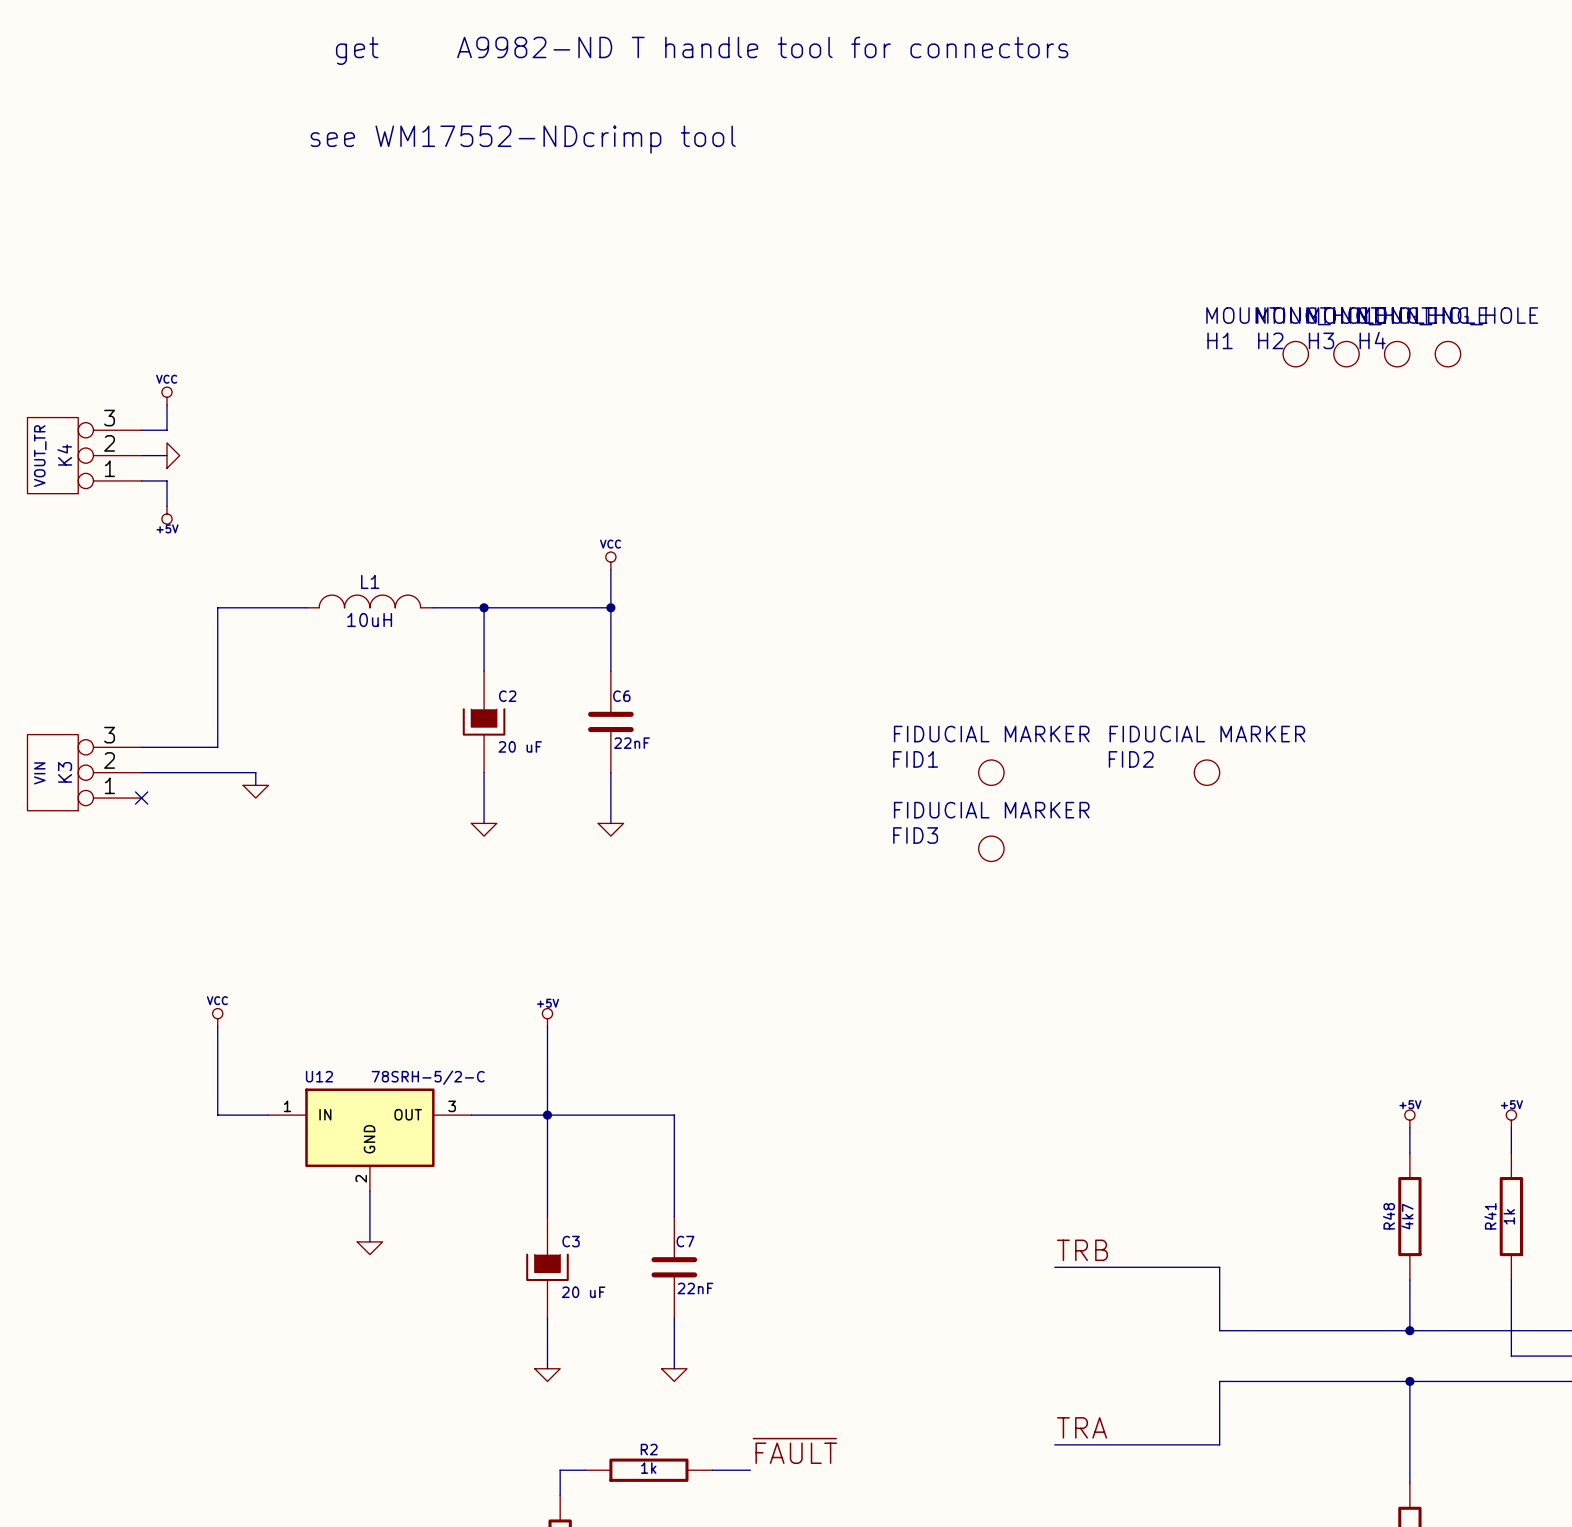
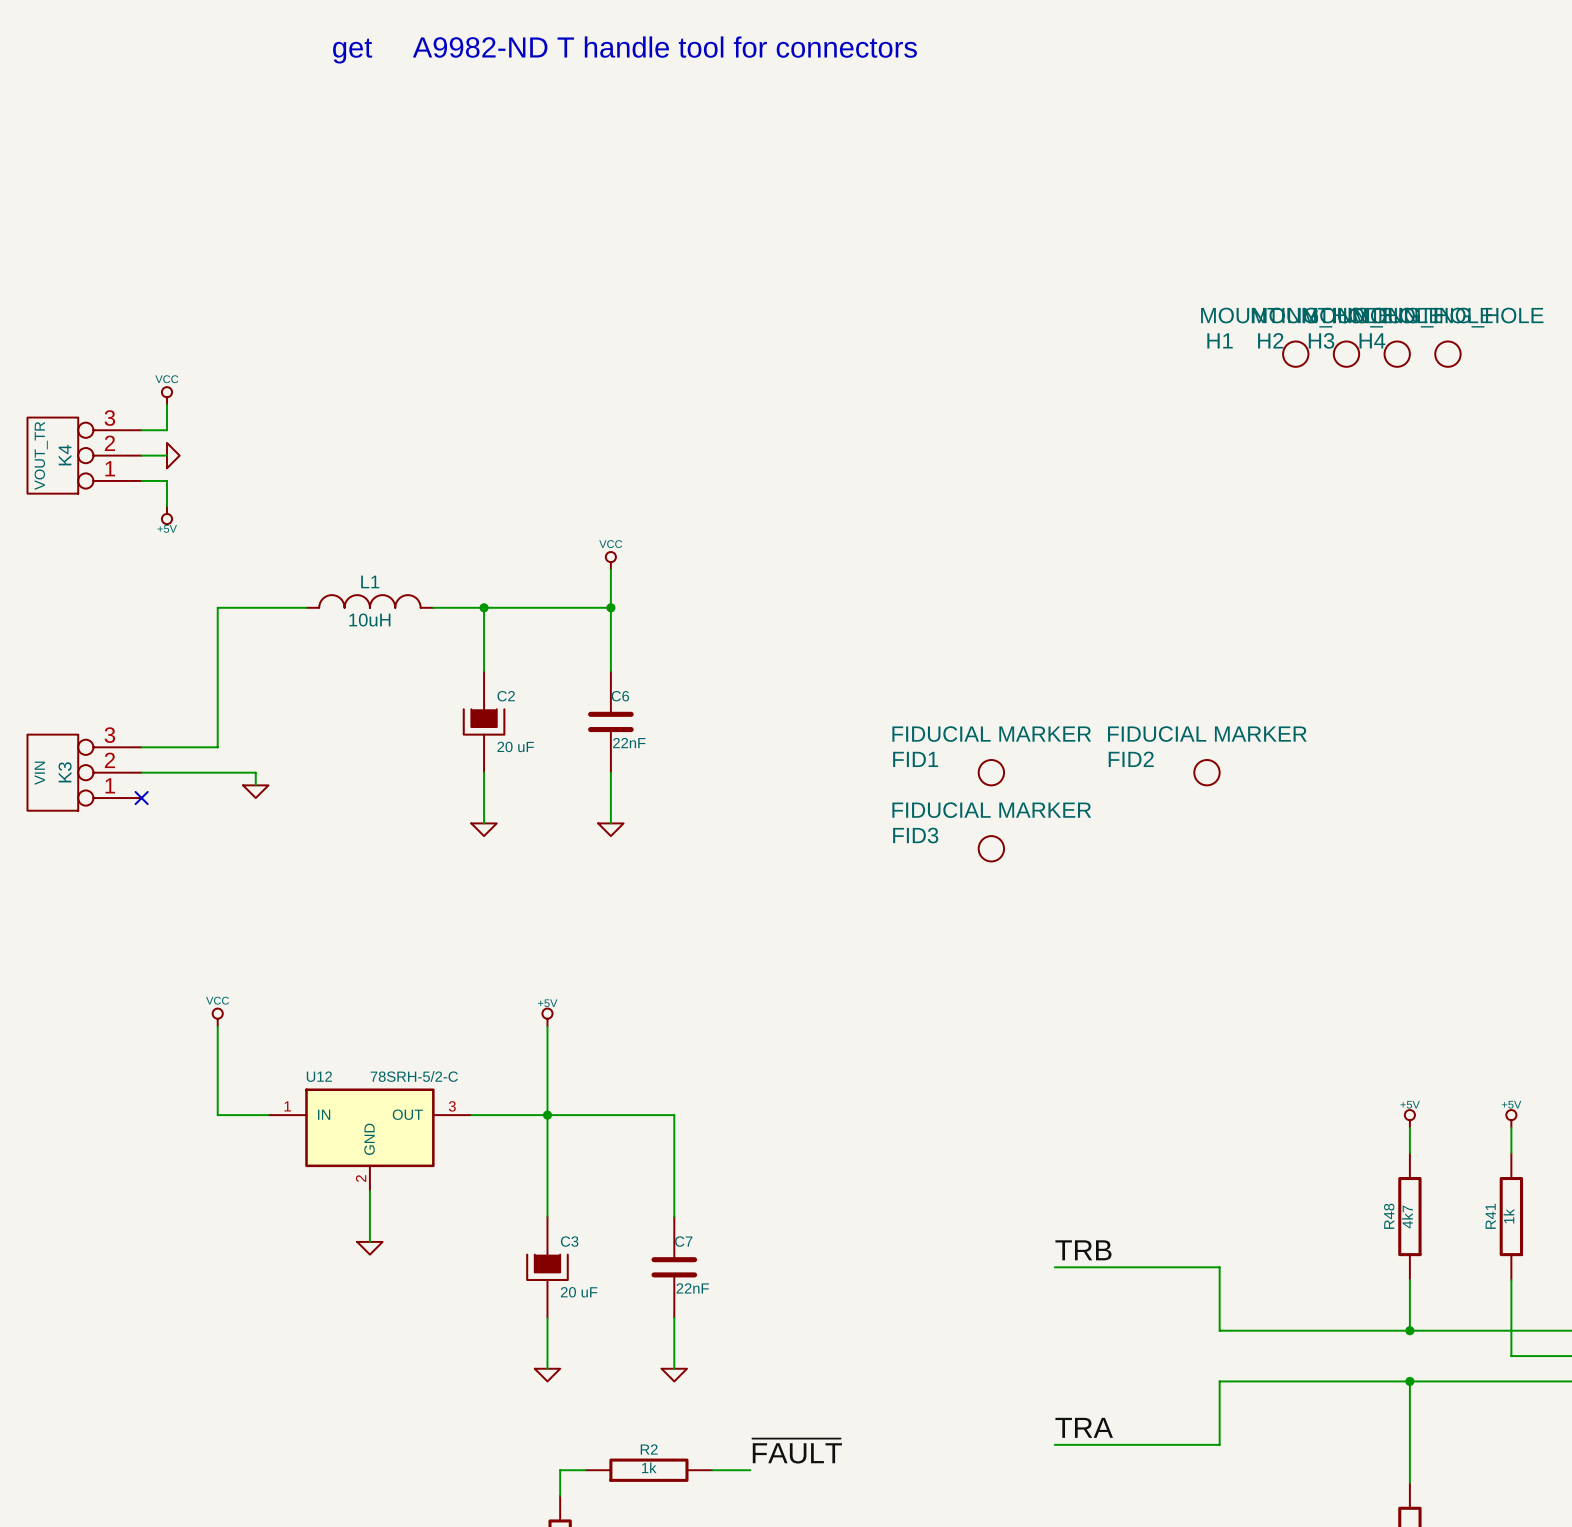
text: see WM17552-NDcrimp tool (523, 139) -> none

